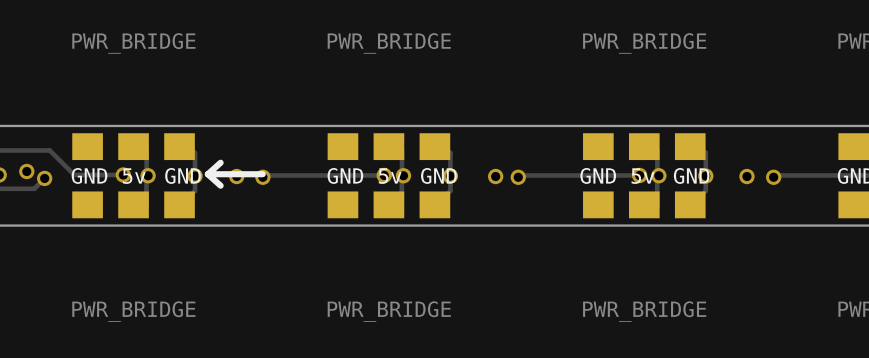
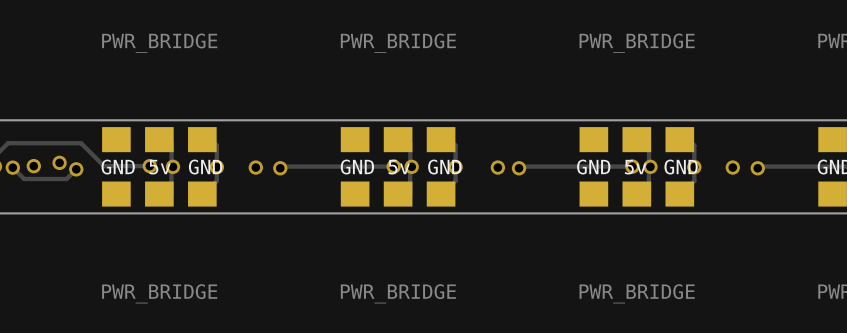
line: (220, 162) (207, 174) -> none
line: (207, 174) (220, 185) -> none
line: (262, 174) (207, 174) -> none

